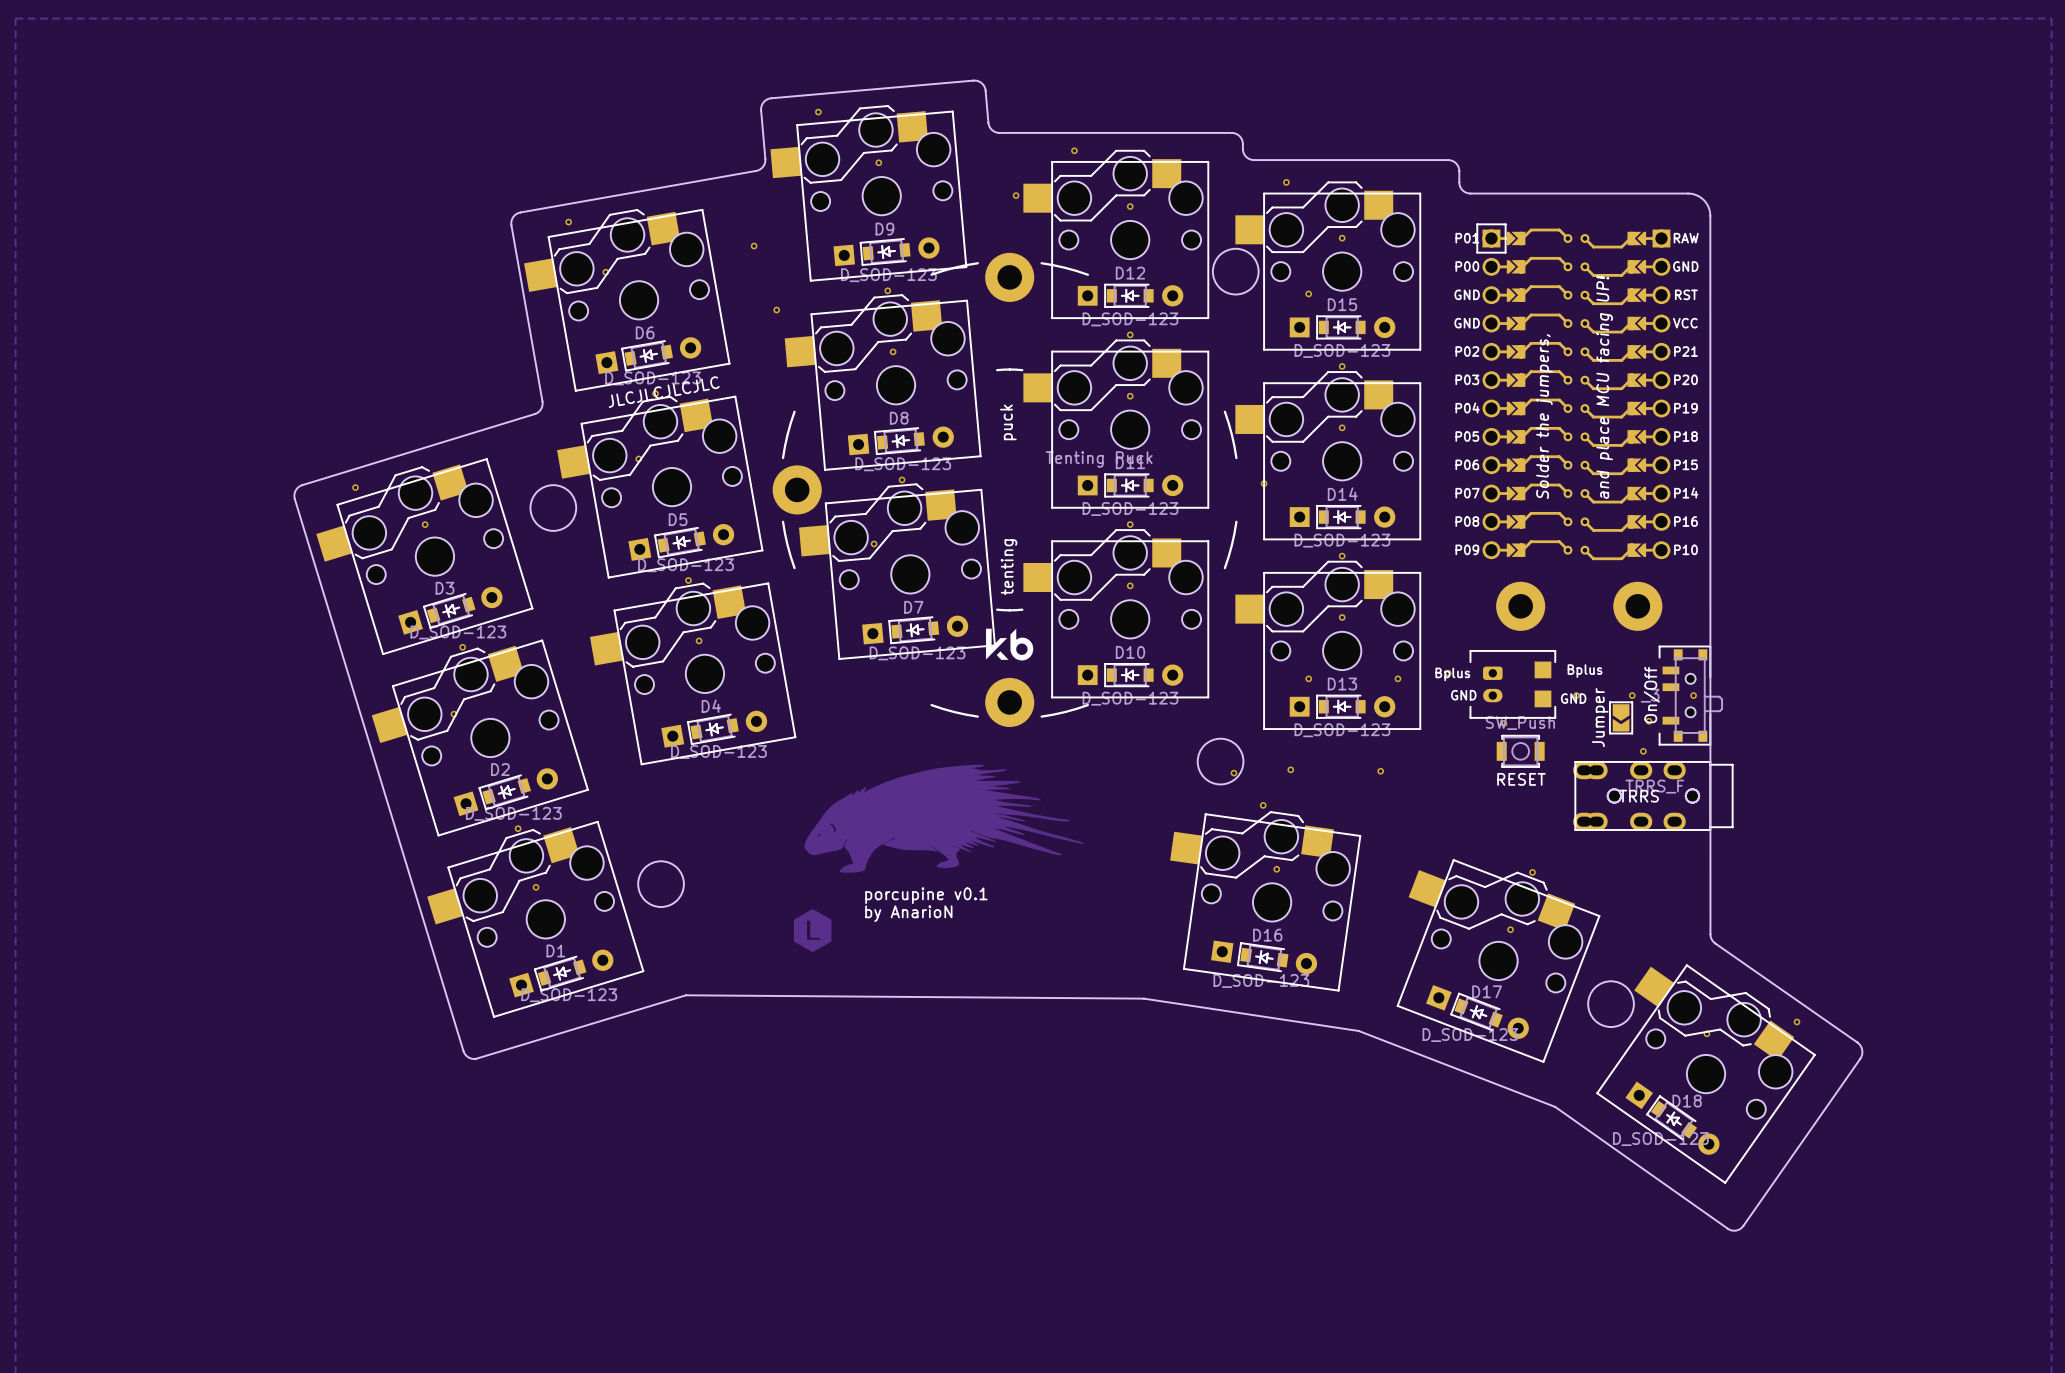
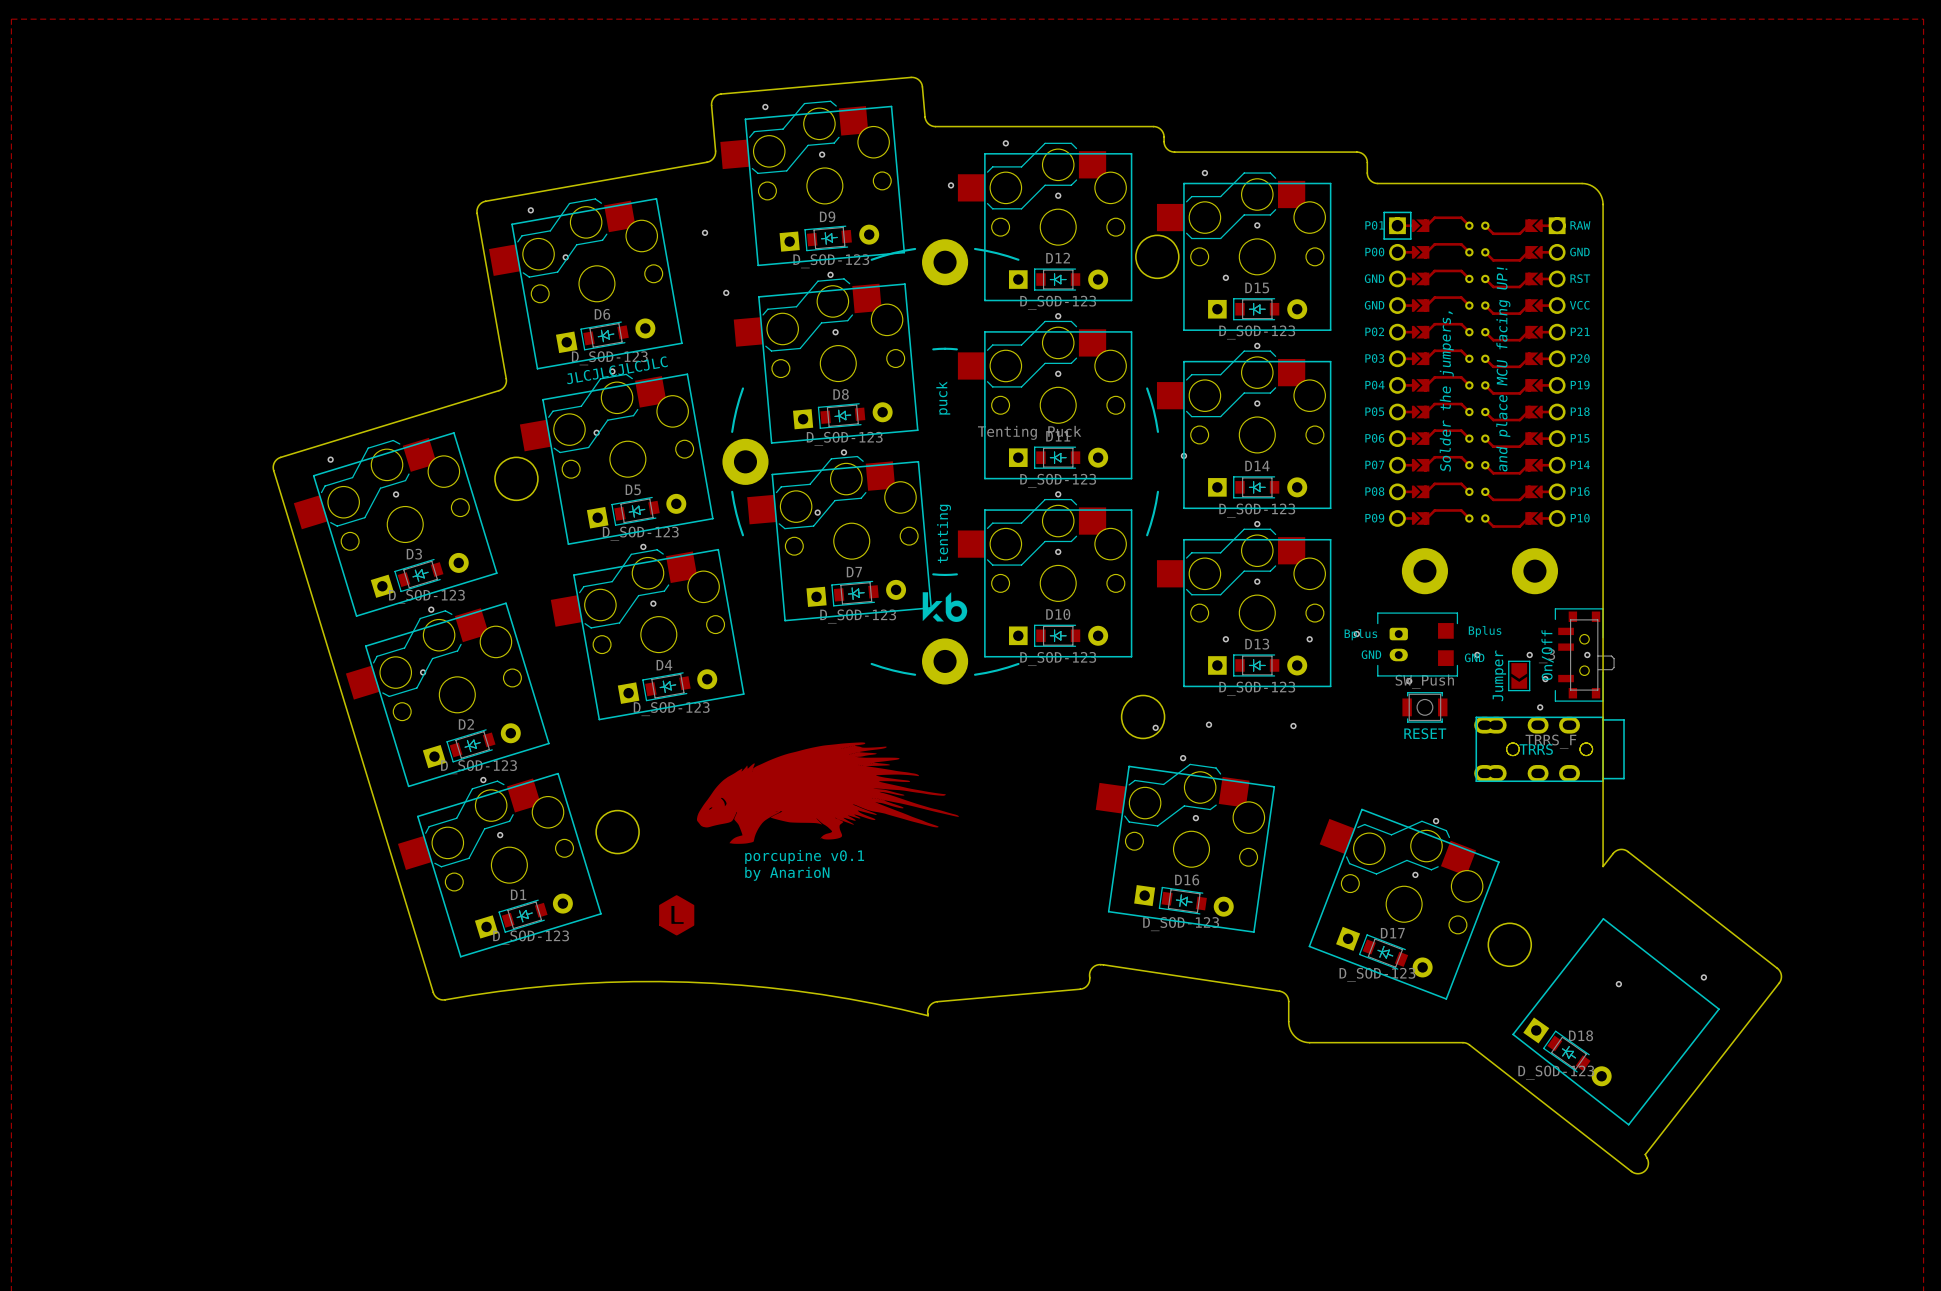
board edge: (1688, 193) (1695, 194) (1703, 200) (1708, 206) (1710, 215) (1710, 936) (1715, 943) (1857, 1042) (1862, 1051) (1860, 1058) (1743, 1225) (1736, 1230) (1727, 1228) (1555, 1106) (1358, 1031) (1144, 998) (686, 995) (476, 1058) (469, 1057) (463, 1051) (294, 499) -> (1582, 183) (1590, 185) (1596, 189) (1601, 196) (1603, 204) (1603, 866) (1615, 851) (1621, 849) (1627, 850) (1777, 968) (1781, 976) (1779, 983) (1645, 1154) (1648, 1165) (1644, 1171) (1640, 1173) (1631, 1171) (1466, 1043) (1305, 1042) (1296, 1038) (1290, 1030) (1288, 999) (1282, 991) (1103, 964) (1092, 967) (1088, 983) (1081, 989) (936, 1001) (929, 1006) (928, 1015) (822, 994) (768, 987) (687, 982) (579, 983) (438, 999) (433, 992) (273, 470)
drawing position: (943, 818) -> (827, 793)
text position: porcupine v0.1 (926, 895) -> porcupine v0.1 (804, 856)
text position: by AnarioN (908, 913) -> by AnarioN (787, 873)
drawing position: (812, 930) -> (676, 915)
line: (1686, 965) (1597, 1093) (1725, 1182) (1814, 1054) (1686, 965) -> (1603, 918) (1513, 1034) (1628, 1124) (1718, 1009) (1603, 918)
via position: (1796, 1021) -> (1703, 977)
via position: (1706, 1033) -> (1618, 984)
part: (1714, 1042) -> none

